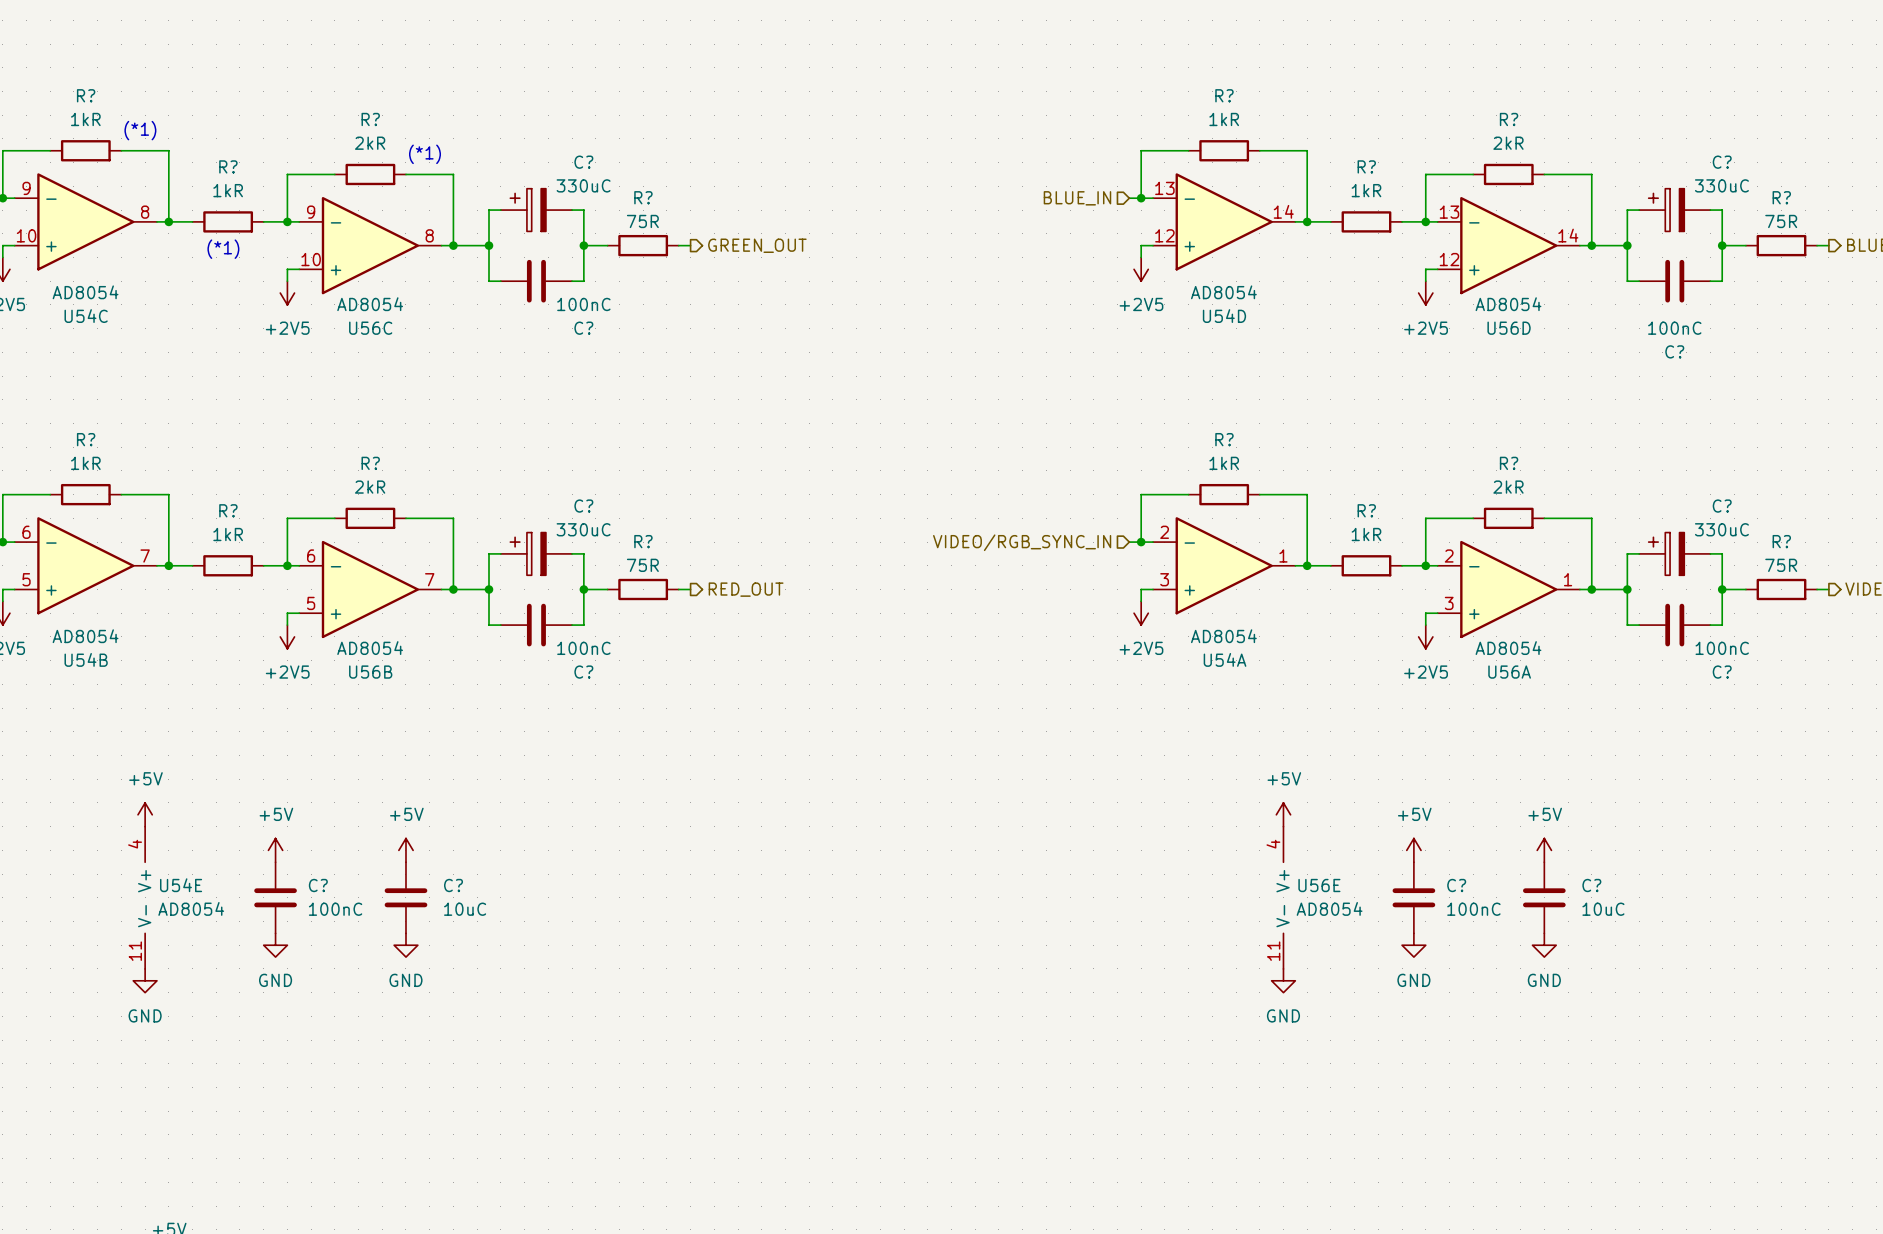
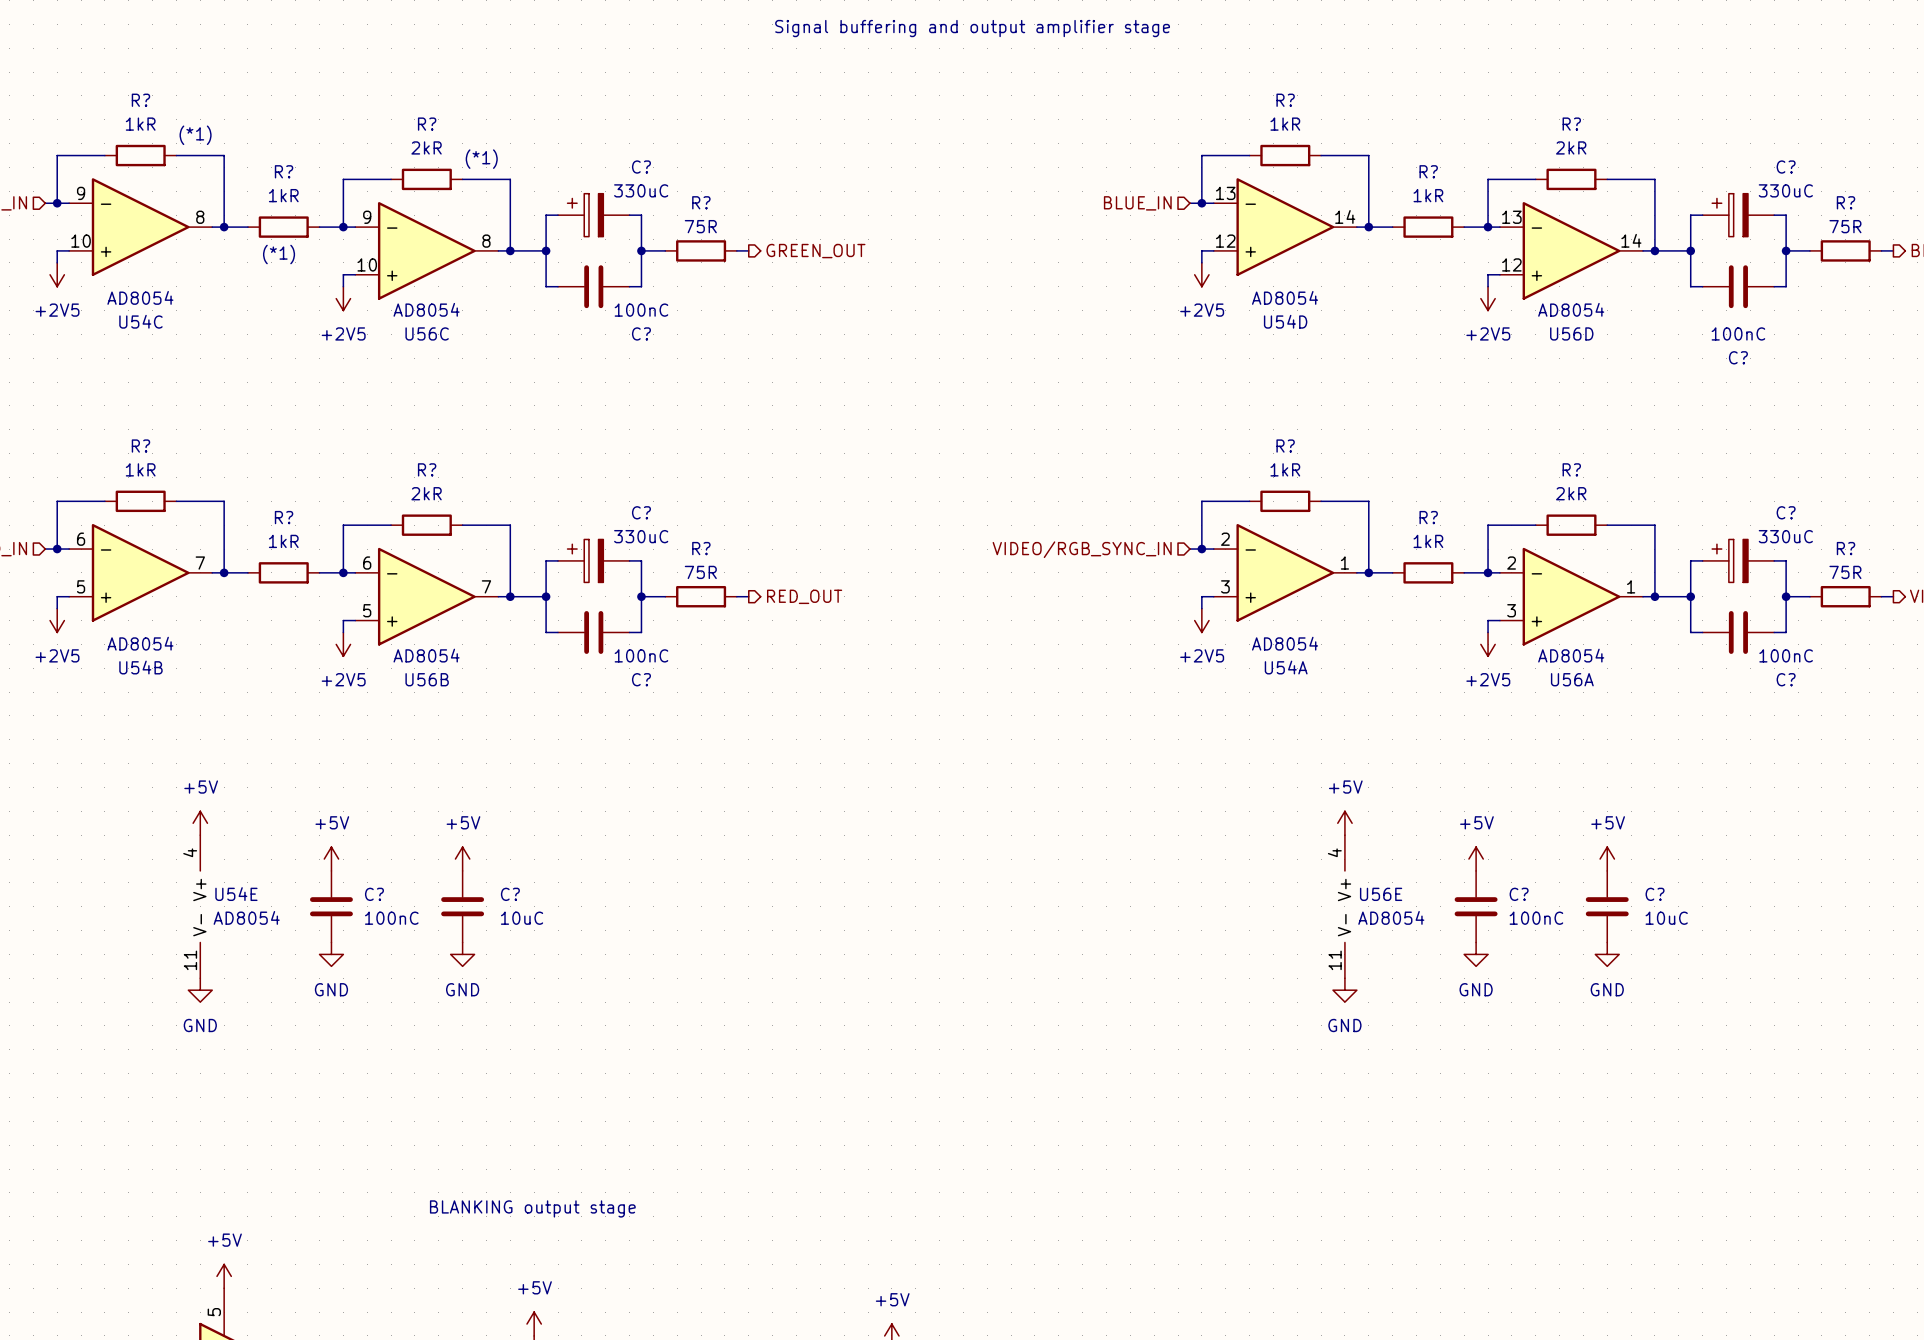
text: none -> Signal buffering and output amplifier stage (972, 28)
text: none -> BLANKING output stage (532, 1208)

